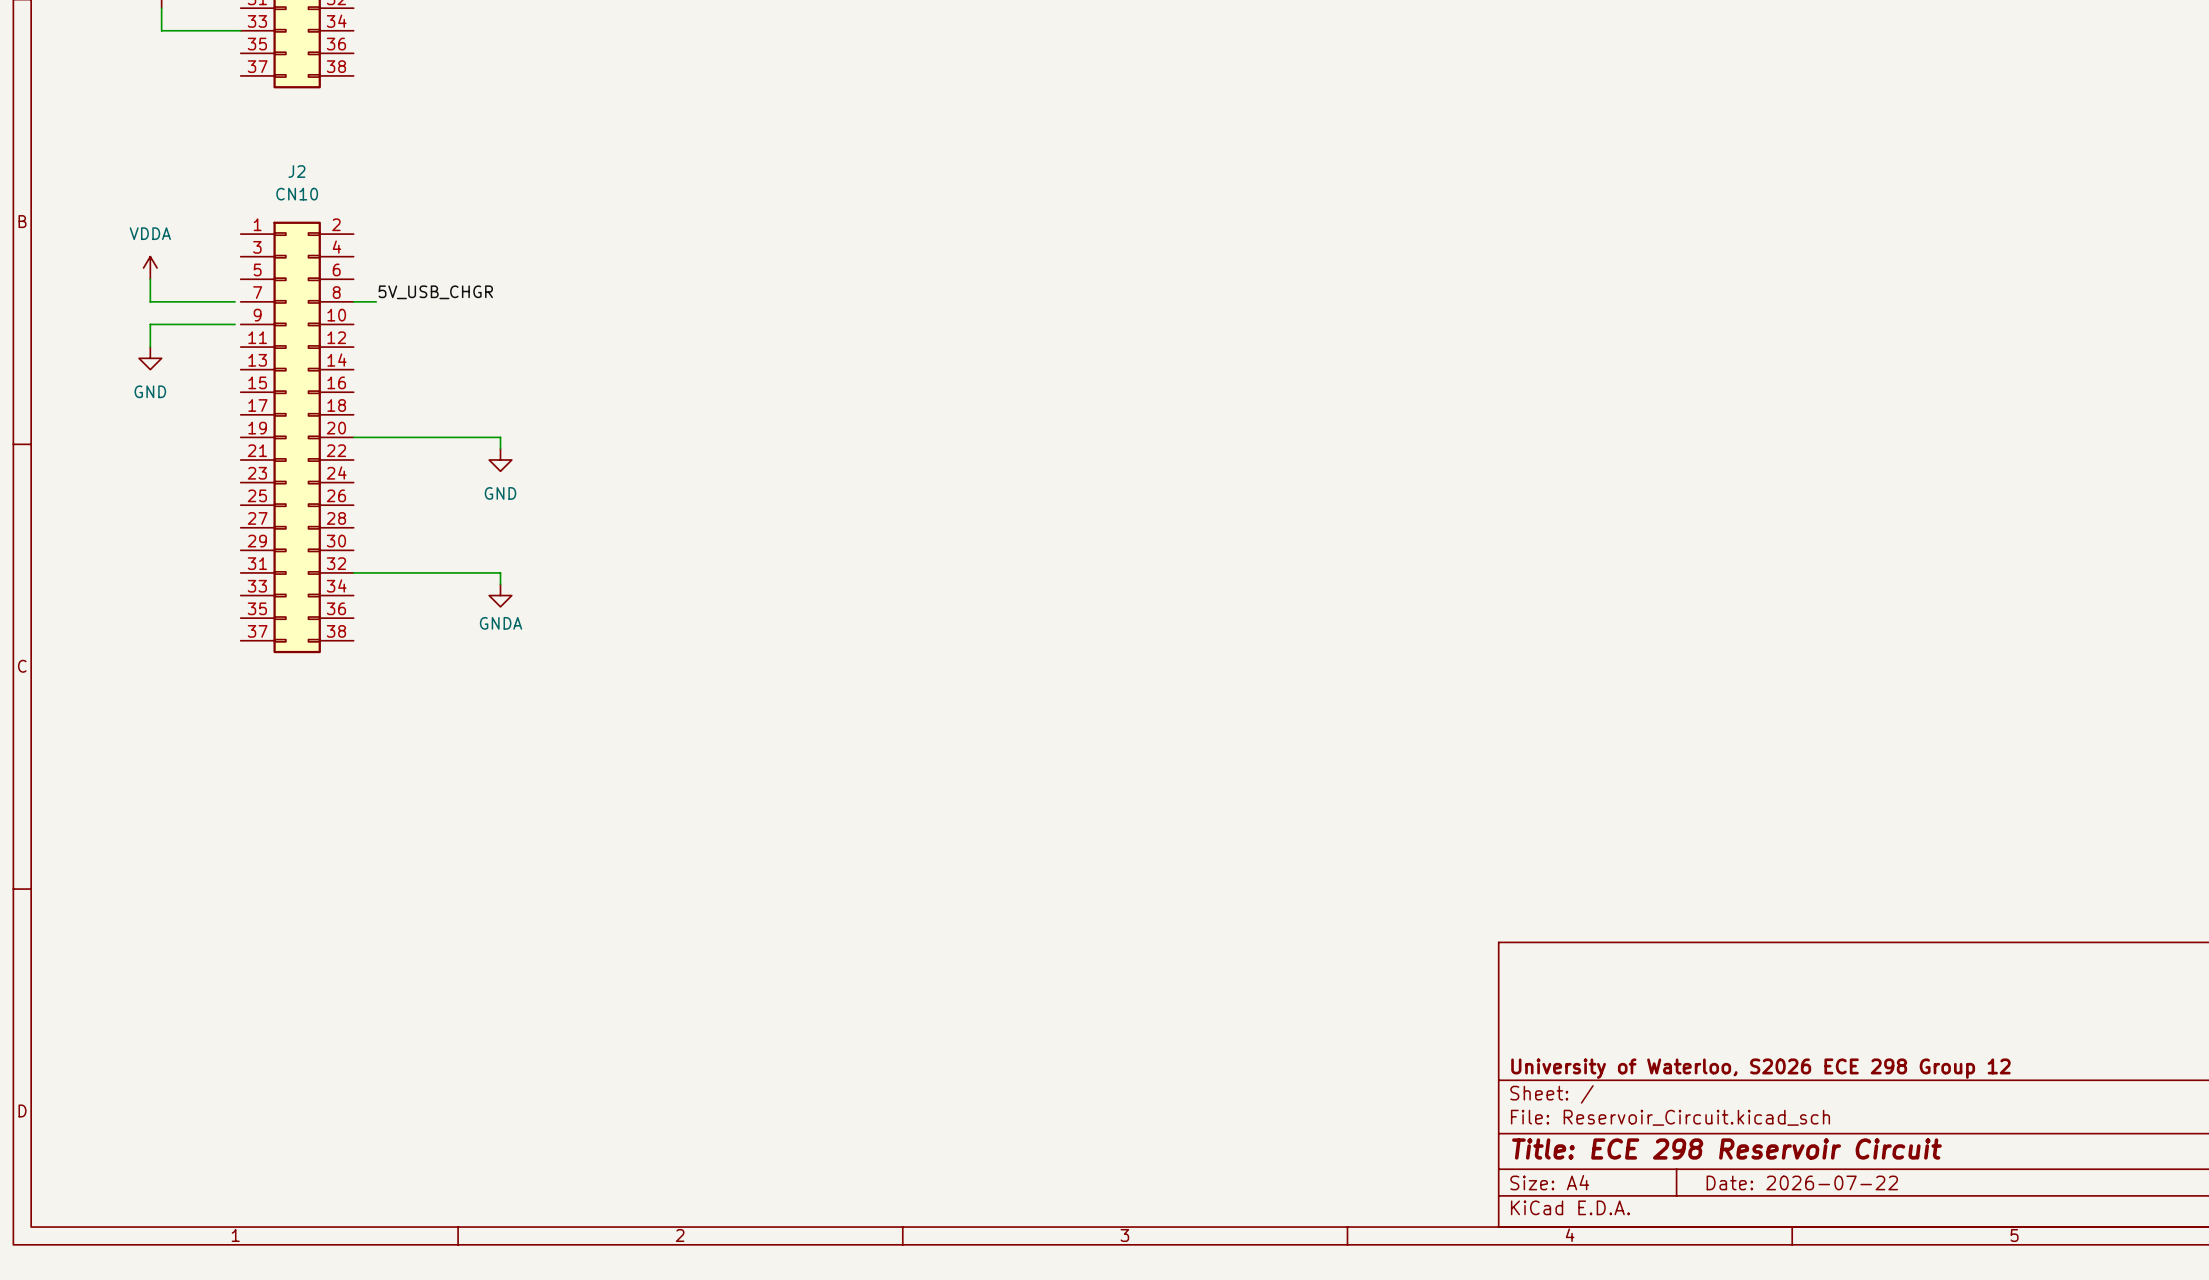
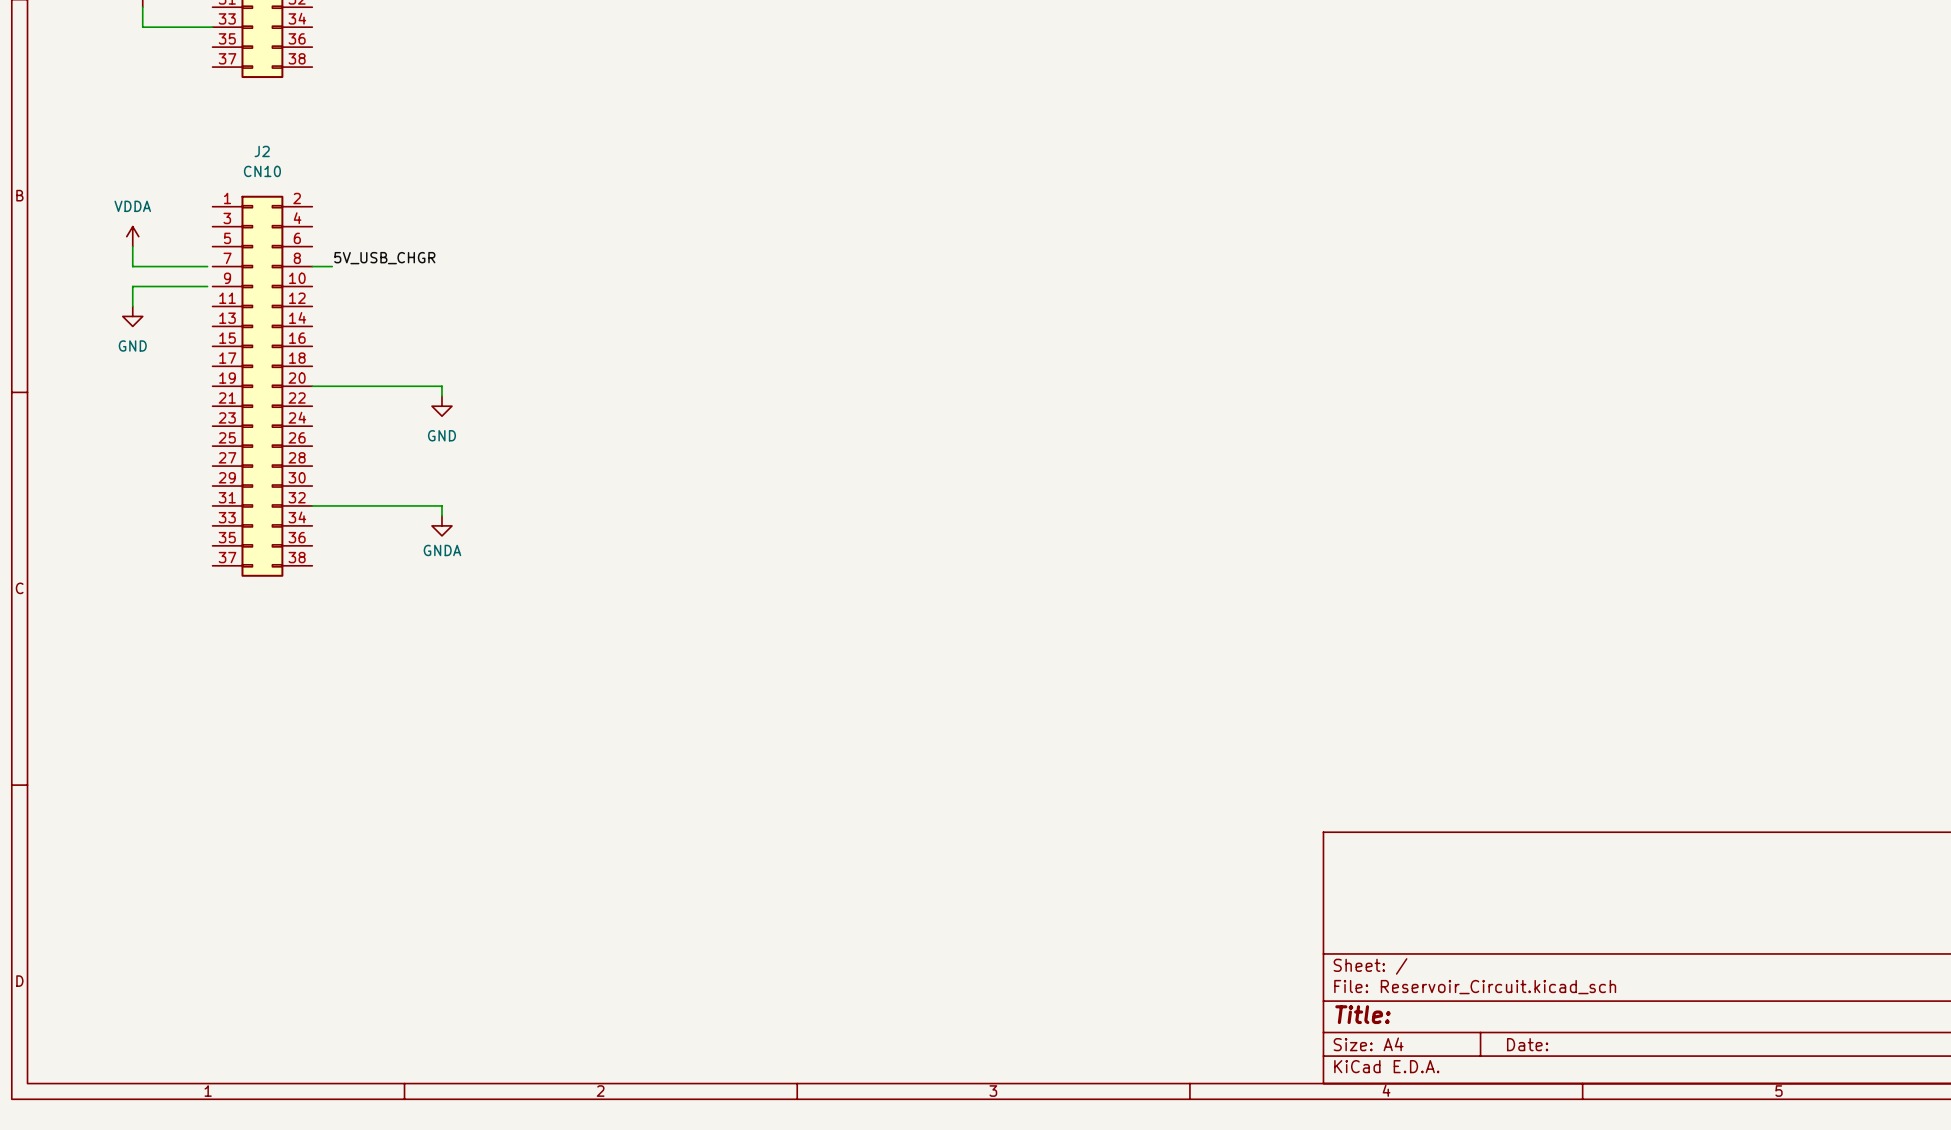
title block: University of Waterloo, S2026 ECE 298 Group 12 (1760, 1068) -> none
title block: Title: ECE 298 Reservoir Circuit (1726, 1148) -> Title: (1362, 1014)
title block: Date: 2026-07-22 (1802, 1182) -> Date: (1527, 1044)

